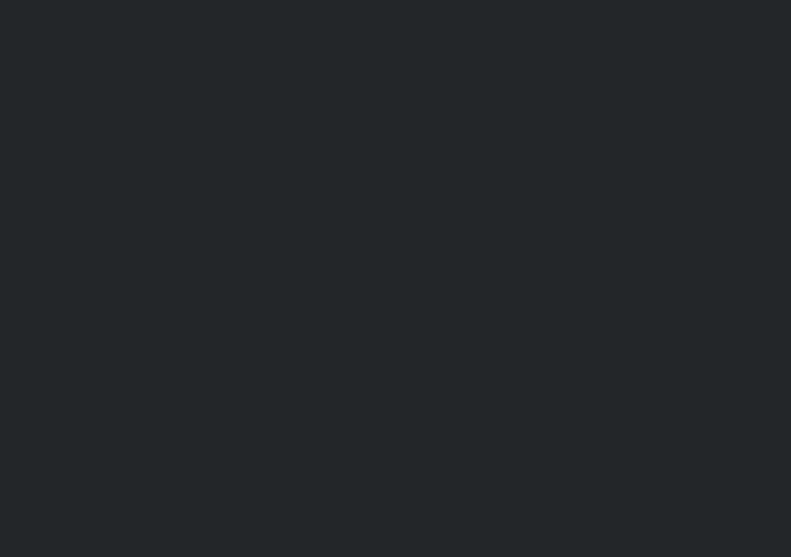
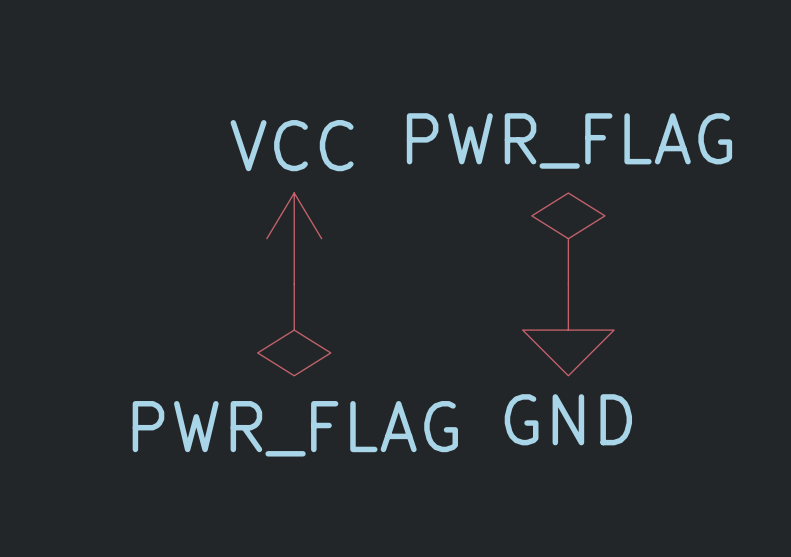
power symbol: none -> VCC (294, 238)
power symbol: none -> PWR_FLAG (568, 238)
power symbol: none -> PWR_FLAG (294, 330)
power symbol: none -> GND (568, 330)

